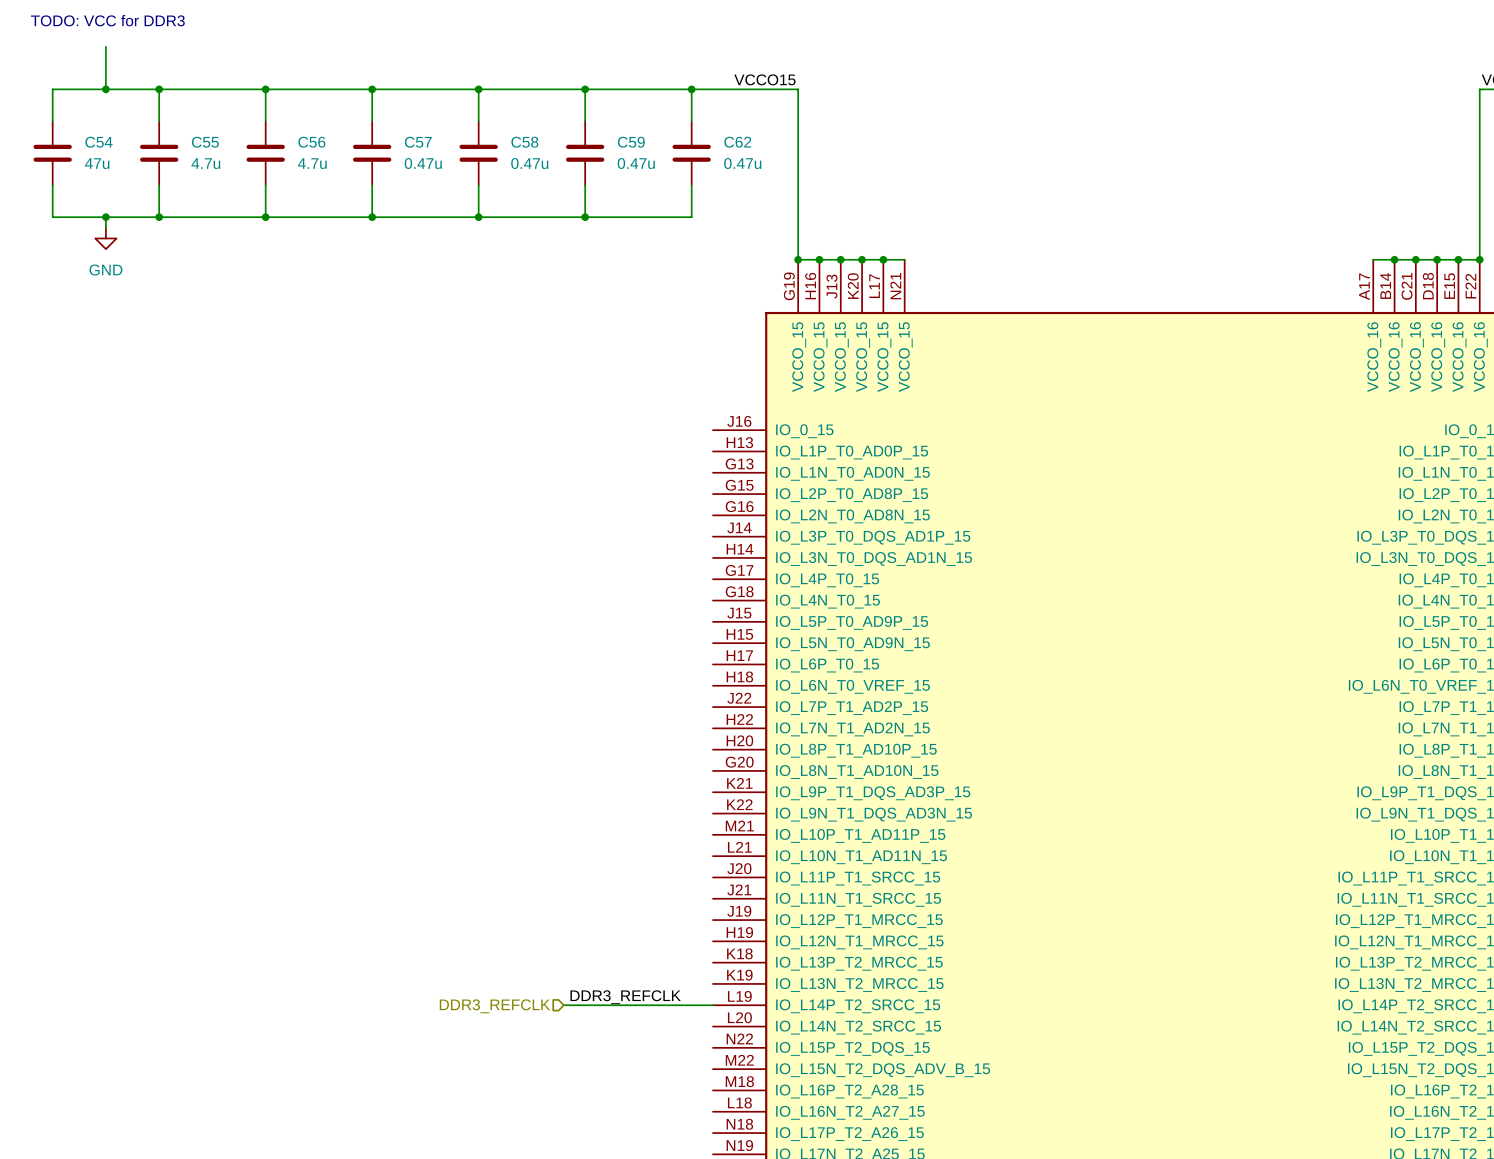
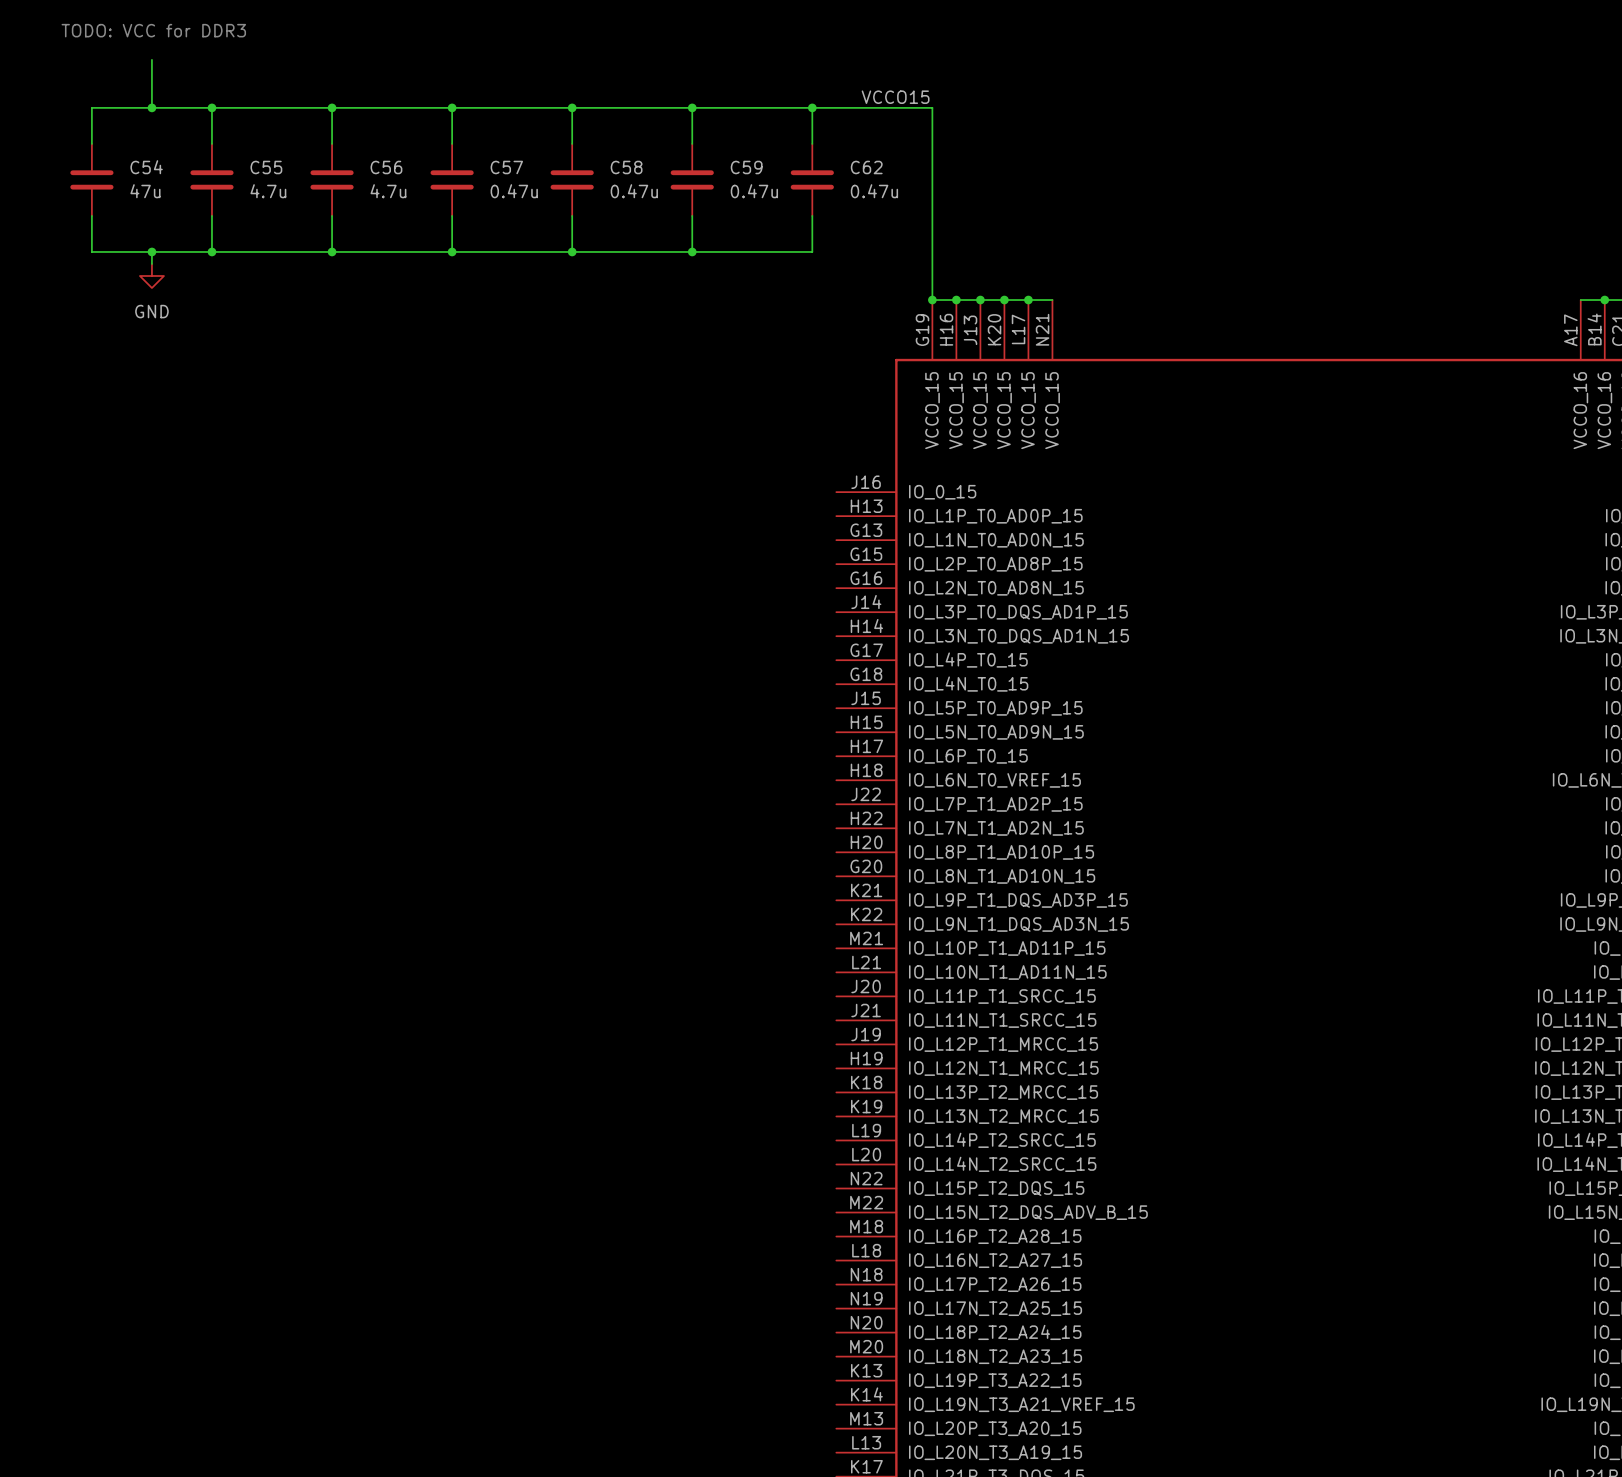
label: DDR3_REFCLK (625, 997) -> none
wire: (563, 1005) (712, 1005) -> none
hierarchical label: DDR3_REFCLK (494, 1006) -> none

